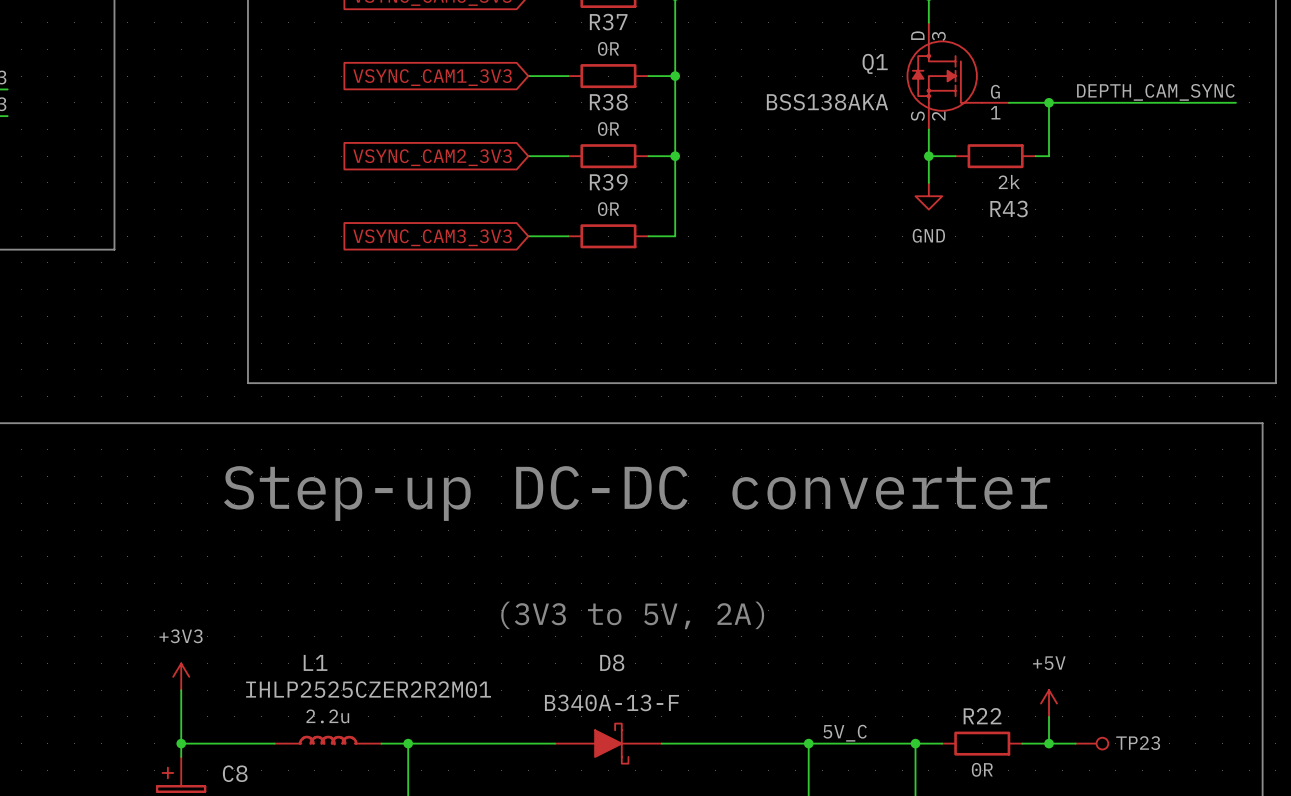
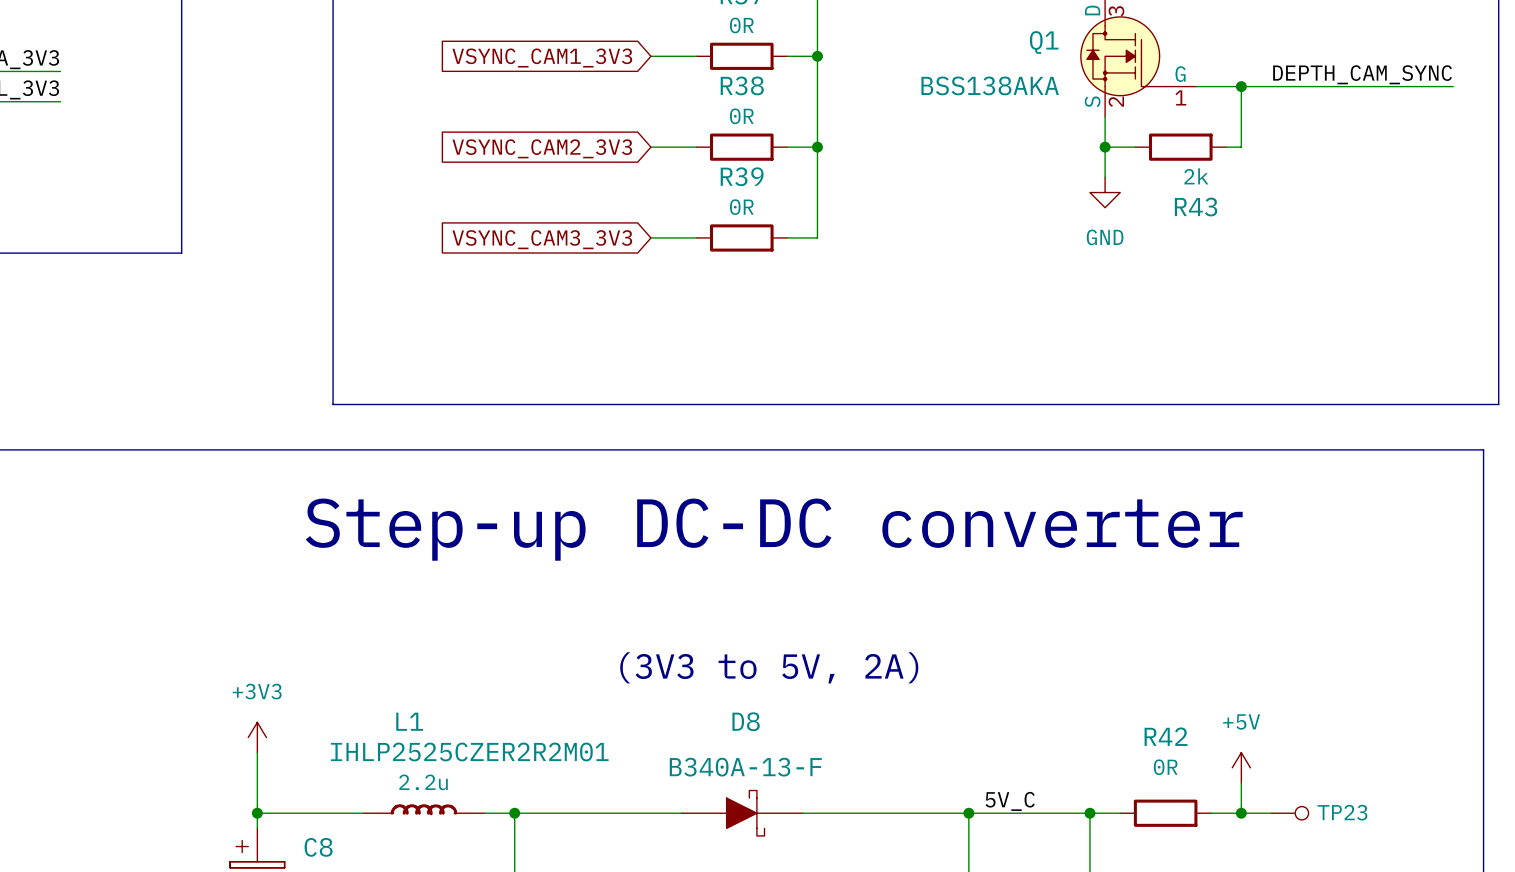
R22 name: R22 (982, 716) -> R42 (1166, 736)
R22 text position: 0R (982, 769) -> 0R (1165, 767)

